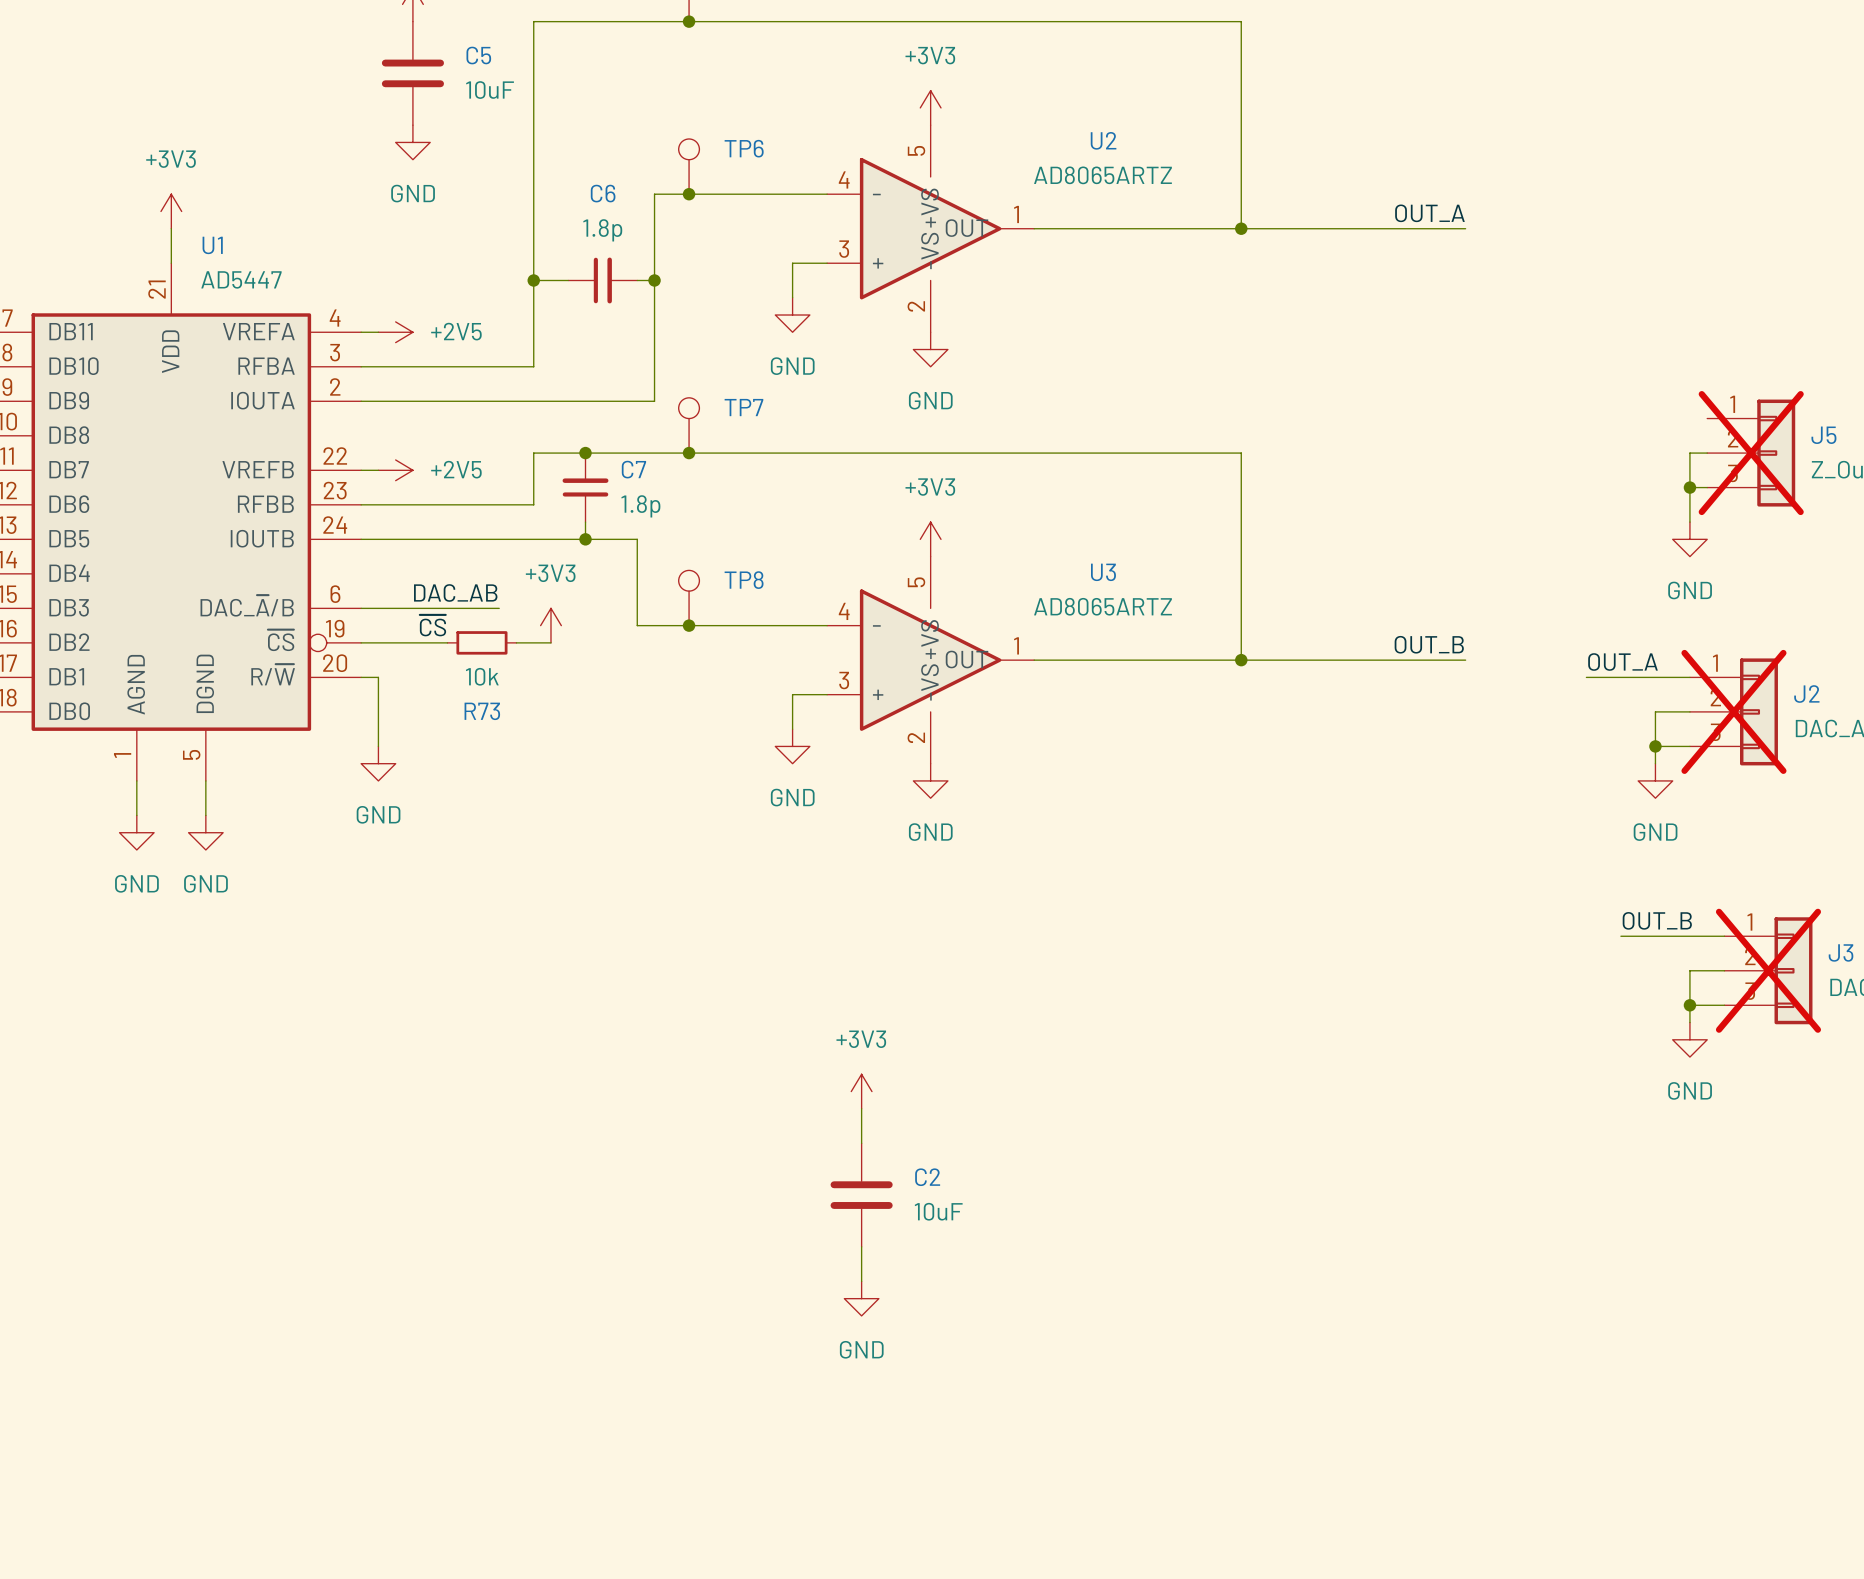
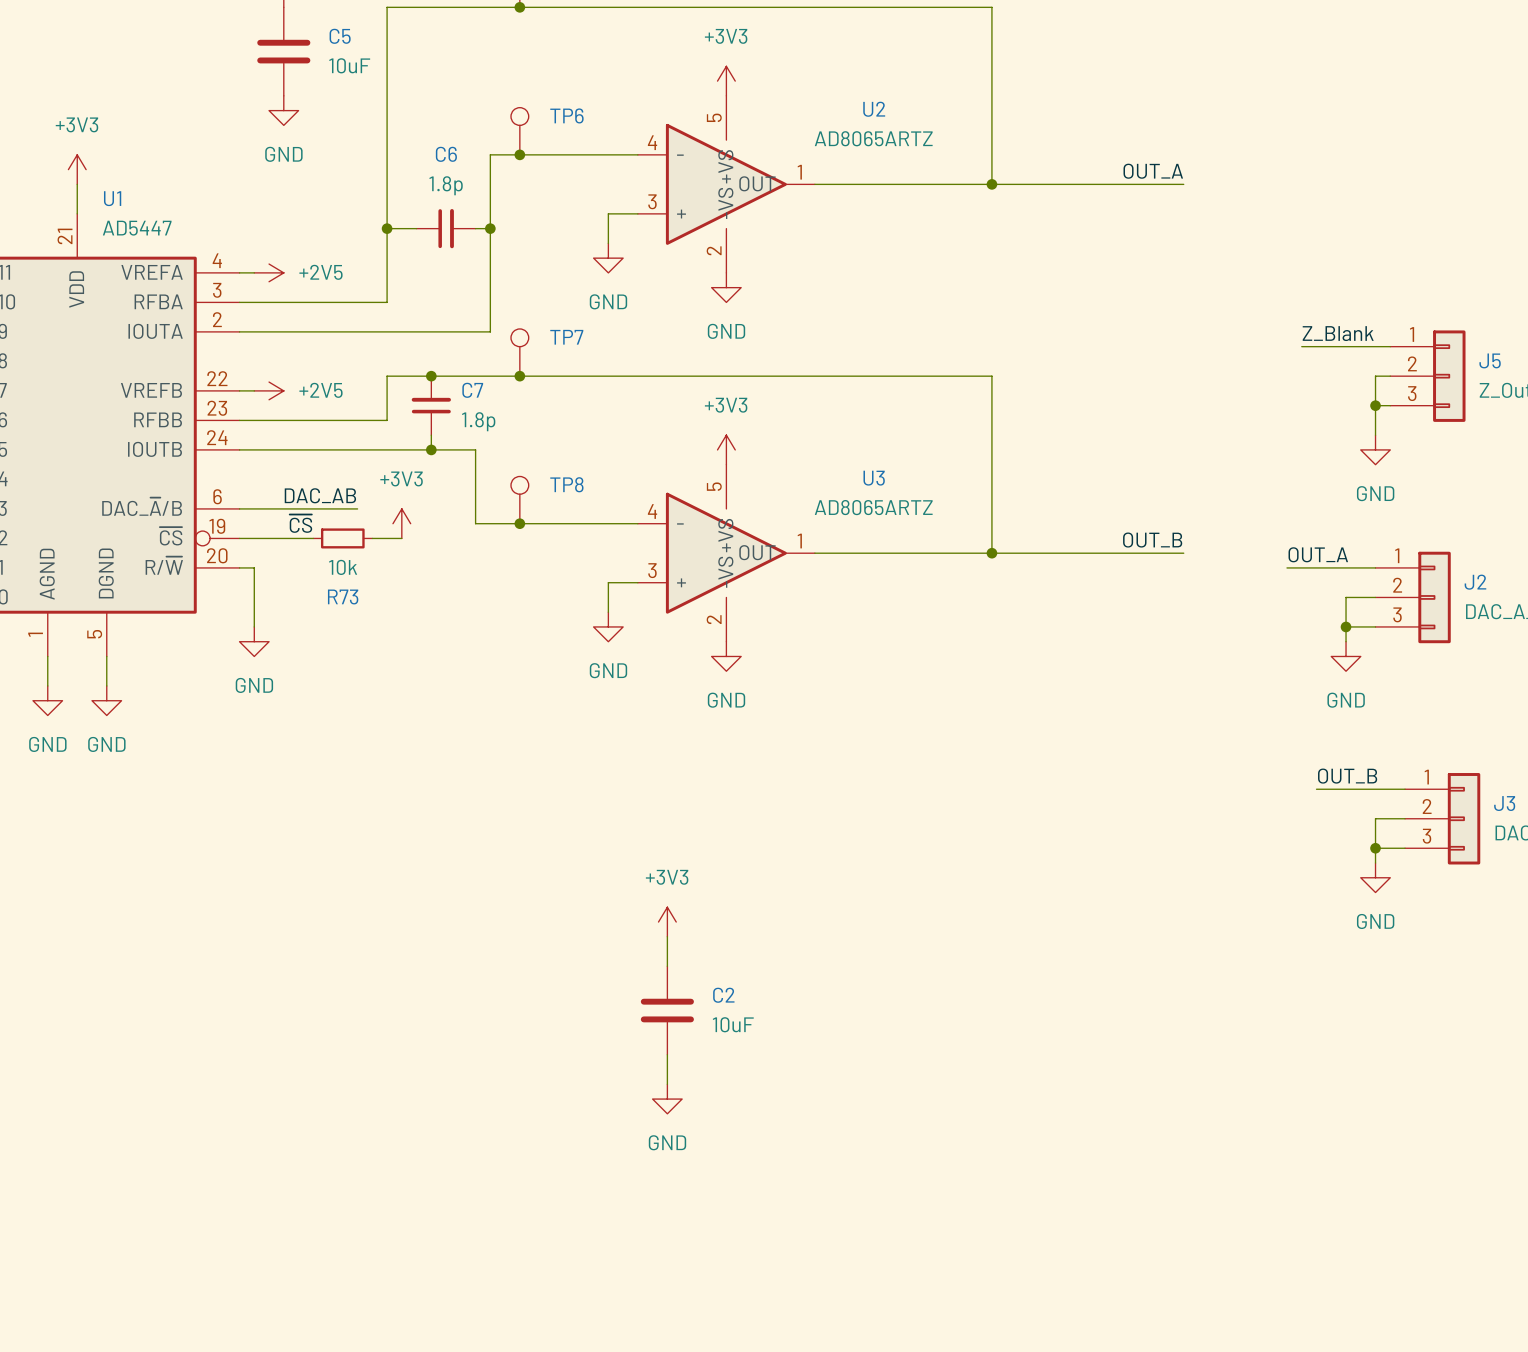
label: none -> Z_Blank (1338, 333)
wire: none -> (1301, 346) (1390, 346)
J5 do-not-place cross: (1751, 453) -> none
J2 do-not-place cross: (1733, 711) -> none
J3 do-not-place cross: (1768, 970) -> none

